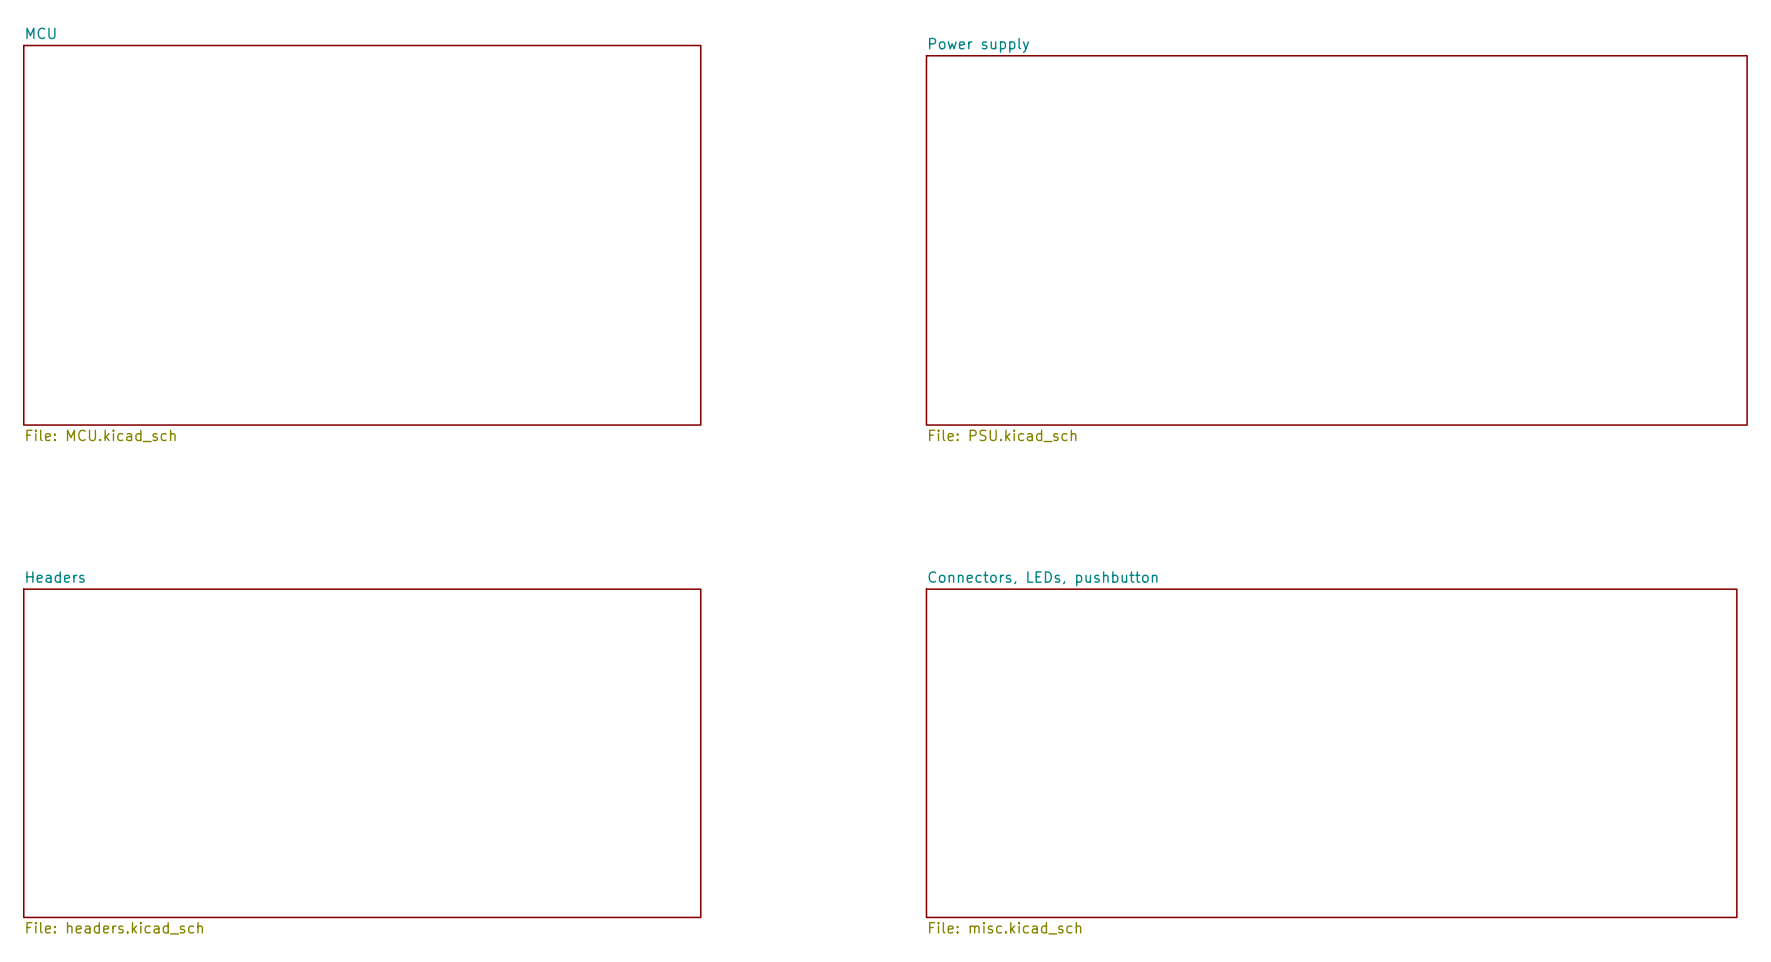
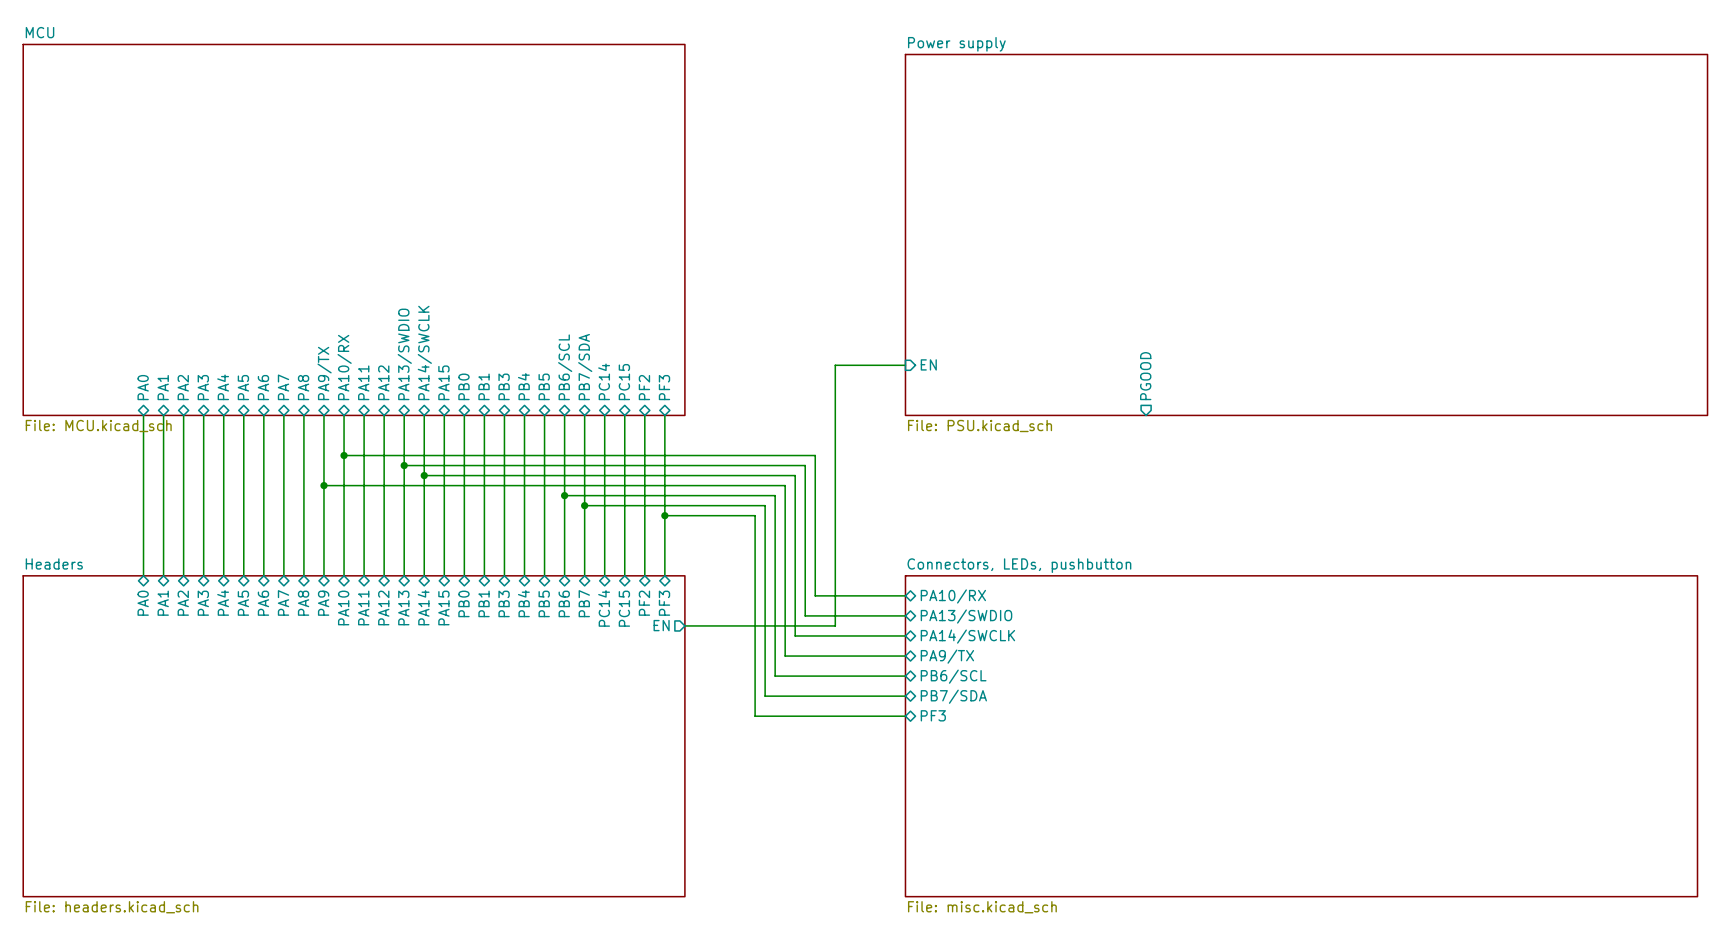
sheet pin: none -> PA14/SWCLK (424, 352)
sheet pin: none -> PA13/SWDIO (404, 354)
wire: none -> (905, 365) (835, 365) (835, 625) (684, 625)
sheet pin: none -> EN (928, 364)
sheet pin: none -> PB6/SCL (565, 367)
sheet pin: none -> PB7/SDA (585, 367)
sheet pin: none -> PA10/RX (344, 367)
sheet pin: none -> PA9/TX (324, 373)
sheet pin: none -> PGOOD (1145, 376)
sheet pin: none -> PC14 (604, 381)
sheet pin: none -> PC15 (624, 382)
sheet pin: none -> PA11 (363, 382)
sheet pin: none -> PA12 (383, 382)
sheet pin: none -> PA15 (443, 382)
sheet pin: none -> PB0 (463, 386)
sheet pin: none -> PB1 (484, 386)
sheet pin: none -> PB3 (504, 386)
sheet pin: none -> PB4 (523, 386)
sheet pin: none -> PB5 (544, 386)
sheet pin: none -> PA0 (143, 387)
sheet pin: none -> PA1 (163, 387)
sheet pin: none -> PA2 (183, 387)
sheet pin: none -> PA3 (203, 387)
sheet pin: none -> PA4 (223, 387)
sheet pin: none -> PA5 (243, 387)
sheet pin: none -> PA6 (263, 387)
sheet pin: none -> PA7 (283, 387)
sheet pin: none -> PA8 (303, 387)
sheet pin: none -> PF2 (644, 387)
sheet pin: none -> PF3 (664, 387)
wire: none -> (143, 415) (143, 575)
wire: none -> (163, 415) (163, 575)
wire: none -> (183, 415) (183, 575)
wire: none -> (203, 415) (203, 575)
wire: none -> (223, 415) (223, 575)
wire: none -> (243, 415) (243, 575)
wire: none -> (263, 415) (263, 575)
wire: none -> (283, 415) (283, 575)
wire: none -> (303, 415) (303, 575)
wire: none -> (323, 415) (323, 575)
wire: none -> (344, 415) (344, 575)
wire: none -> (364, 415) (364, 575)
wire: none -> (384, 415) (384, 575)
wire: none -> (404, 415) (404, 575)
wire: none -> (424, 415) (424, 575)
wire: none -> (444, 415) (444, 575)
wire: none -> (464, 415) (464, 575)
wire: none -> (484, 415) (484, 575)
wire: none -> (504, 415) (504, 575)
wire: none -> (524, 415) (524, 575)
wire: none -> (544, 415) (544, 575)
wire: none -> (564, 415) (564, 575)
wire: none -> (584, 415) (584, 575)
wire: none -> (604, 415) (604, 575)
wire: none -> (624, 415) (624, 575)
wire: none -> (644, 415) (644, 575)
wire: none -> (664, 415) (664, 575)
wire: none -> (344, 455) (815, 455) (815, 595) (905, 595)
junction: none -> (344, 455)
wire: none -> (404, 465) (805, 465) (805, 615) (905, 615)
junction: none -> (404, 465)
wire: none -> (424, 475) (795, 475) (795, 635) (905, 635)
junction: none -> (424, 475)
wire: none -> (323, 485) (785, 485) (785, 656) (905, 656)
junction: none -> (323, 485)
wire: none -> (564, 495) (775, 495) (775, 676) (905, 676)
junction: none -> (564, 495)
wire: none -> (584, 505) (765, 505) (765, 696) (905, 696)
junction: none -> (584, 505)
wire: none -> (664, 515) (755, 515) (755, 716) (905, 716)
junction: none -> (664, 515)
sheet pin: none -> PA10/RX (953, 596)
sheet pin: none -> PA4 (223, 602)
sheet pin: none -> PA7 (283, 602)
sheet pin: none -> PA0 (143, 603)
sheet pin: none -> PA1 (163, 603)
sheet pin: none -> PA2 (183, 603)
sheet pin: none -> PA3 (203, 603)
sheet pin: none -> PA5 (243, 603)
sheet pin: none -> PA6 (263, 603)
sheet pin: none -> PA8 (303, 603)
sheet pin: none -> PA9 (323, 603)
sheet pin: none -> PB0 (463, 603)
sheet pin: none -> PB1 (484, 603)
sheet pin: none -> PB3 (504, 603)
sheet pin: none -> PB4 (523, 603)
sheet pin: none -> PB5 (544, 603)
sheet pin: none -> PB6 (564, 603)
sheet pin: none -> PB7 (584, 603)
sheet pin: none -> PF2 (644, 603)
sheet pin: none -> PF3 (664, 603)
sheet pin: none -> PA14 (423, 607)
sheet pin: none -> PA10 (343, 607)
sheet pin: none -> PA11 (363, 607)
sheet pin: none -> PA12 (383, 607)
sheet pin: none -> PA13 (403, 607)
sheet pin: none -> PA15 (443, 607)
sheet pin: none -> PC14 (604, 608)
sheet pin: none -> PC15 (624, 608)
sheet pin: none -> PA13/SWDIO (966, 616)
sheet pin: none -> EN (661, 625)
sheet pin: none -> PA14/SWCLK (967, 636)
sheet pin: none -> PA9/TX (947, 656)
sheet pin: none -> PB6/SCL (953, 676)
sheet pin: none -> PB7/SDA (953, 696)
sheet pin: none -> PF3 (933, 715)

